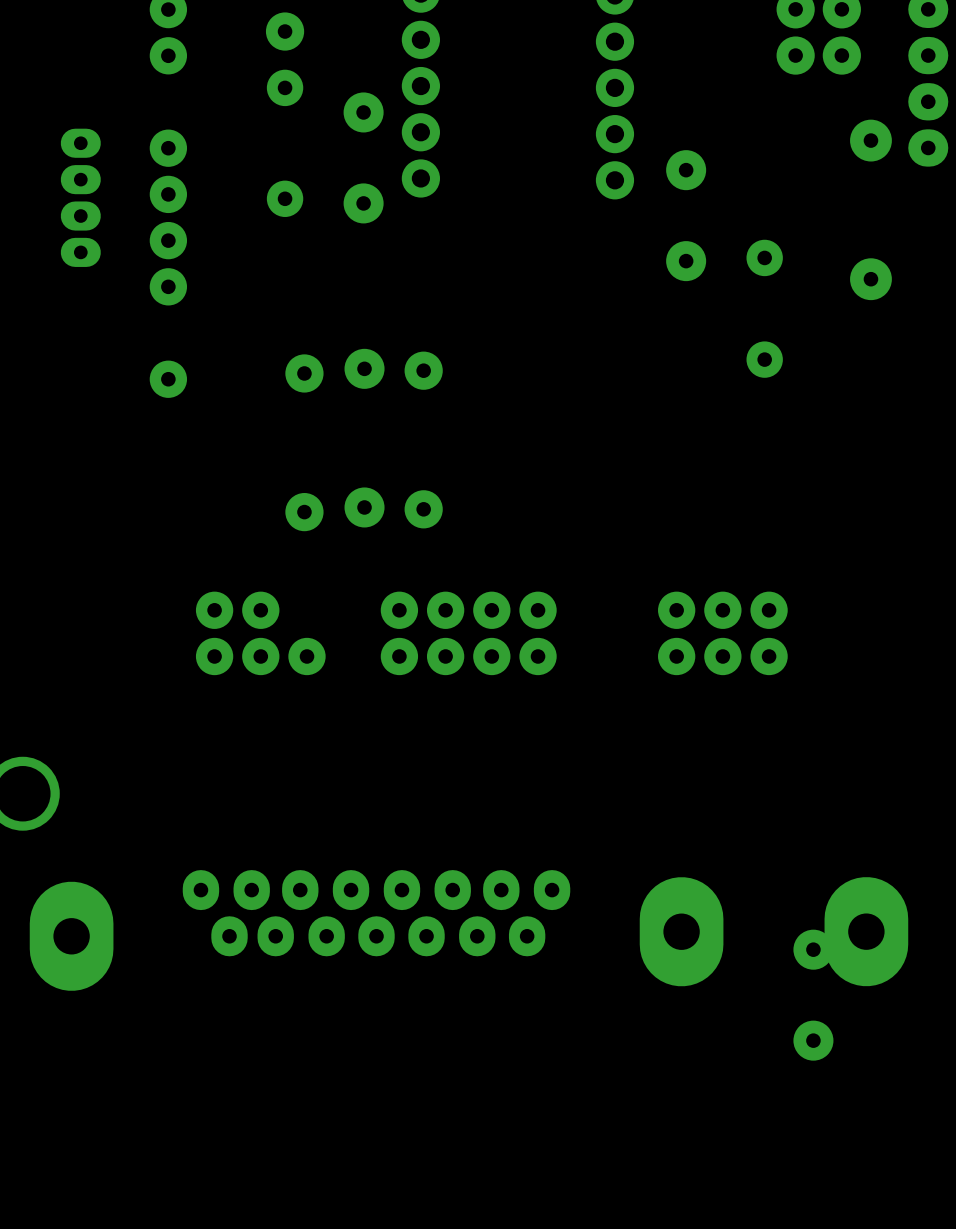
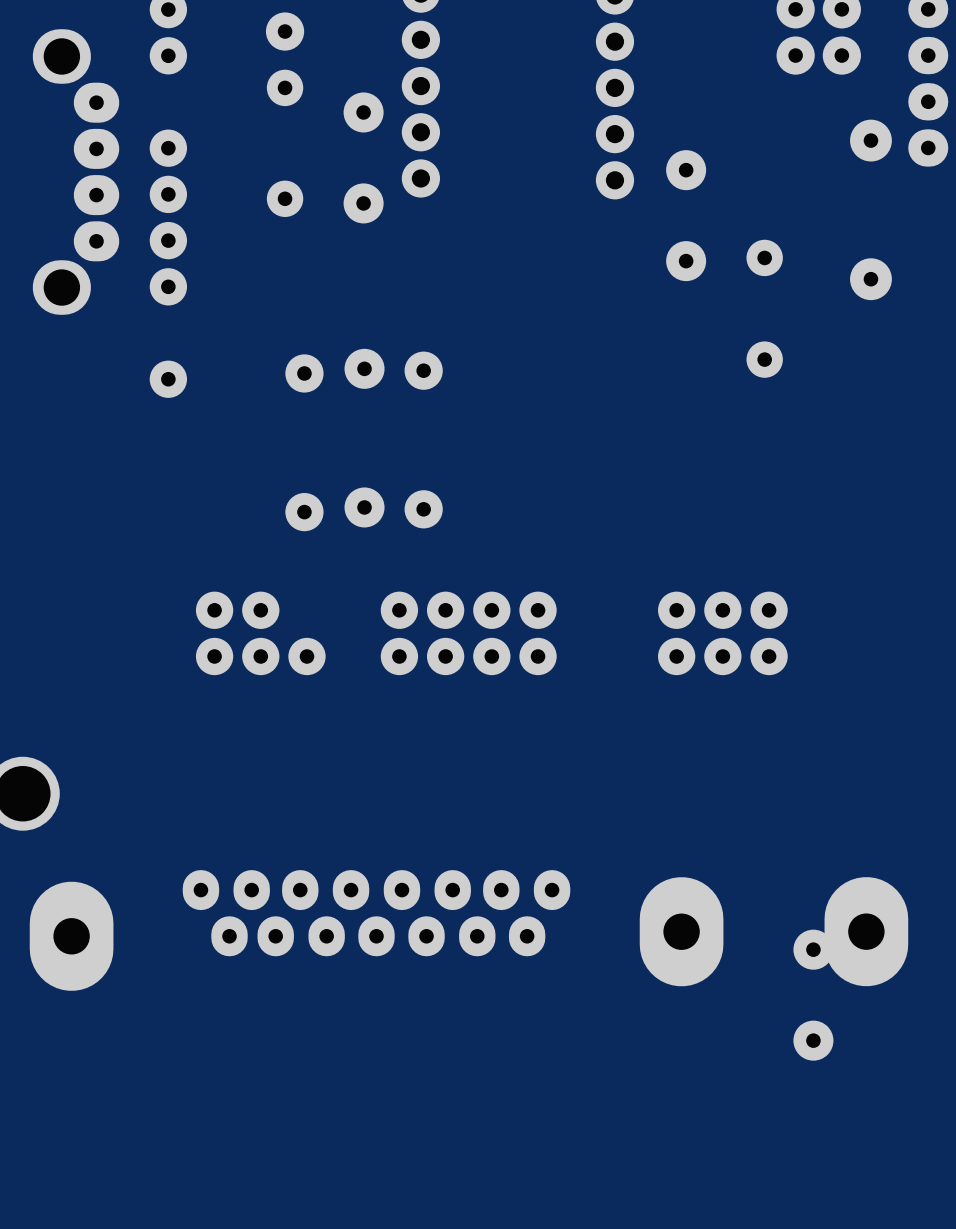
part: none -> (76, 172)
part: (80, 197) -> none

